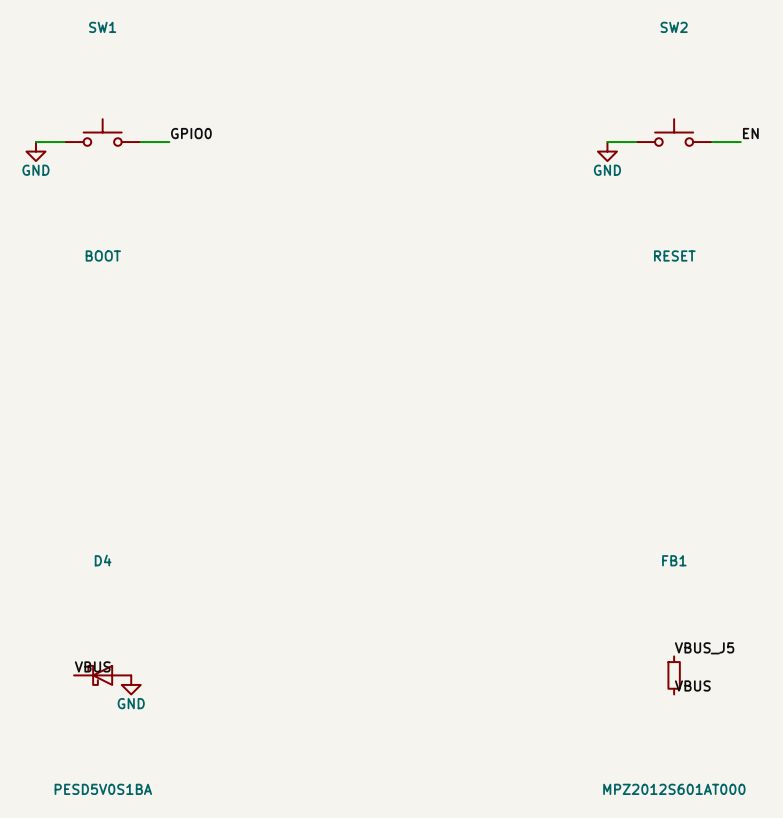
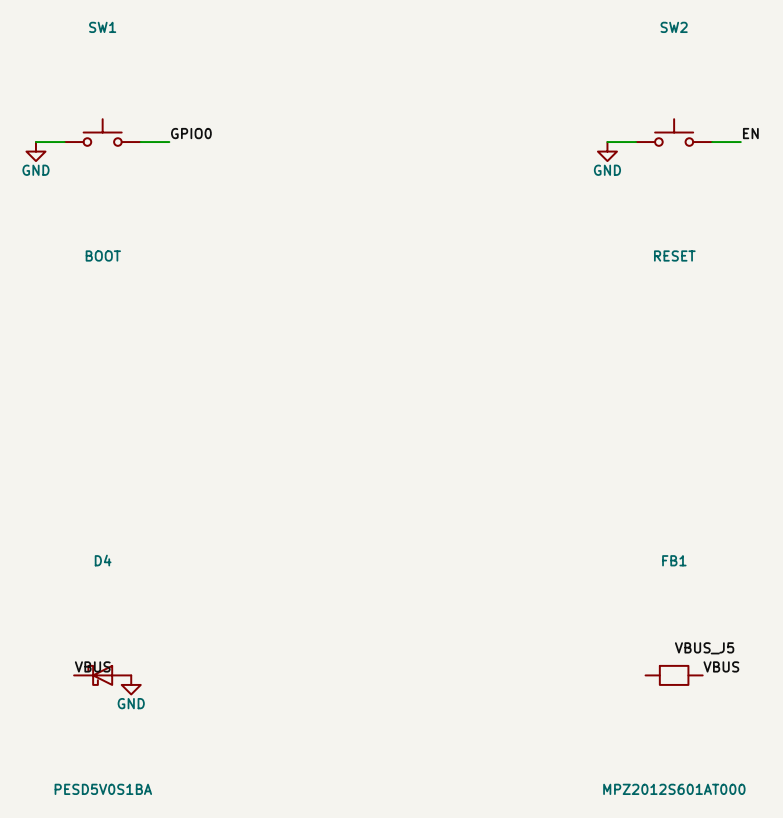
FB1 symbol: [667, 656, 681, 695] -> [645, 665, 703, 686]
label position: VBUS (692, 685) -> VBUS (721, 666)

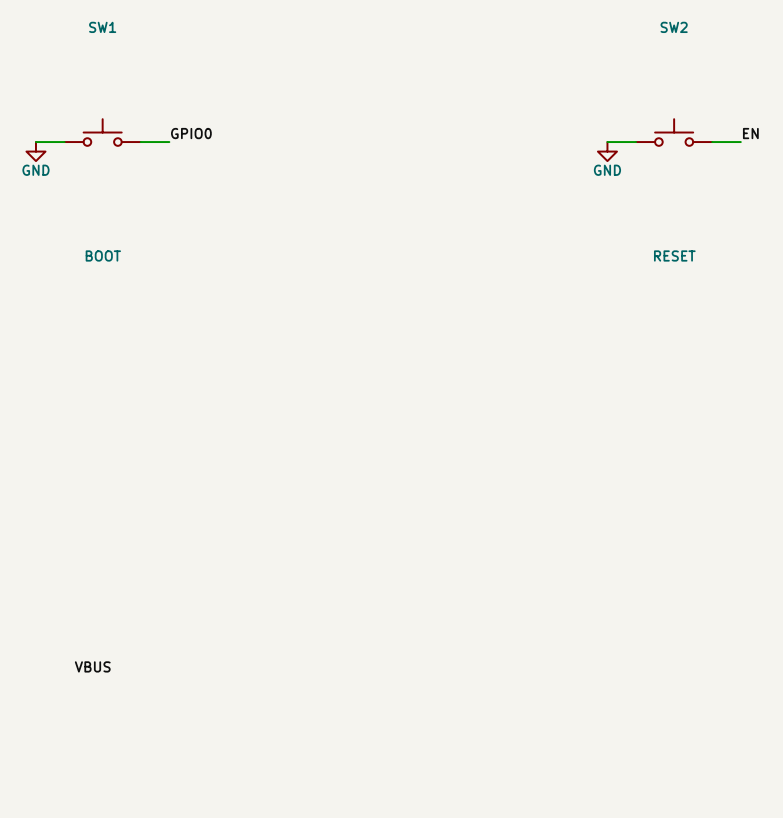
label: VBUS_J5 (704, 648) -> none
label: VBUS (721, 666) -> none
D4: PESD5V0S1BA (102, 675) -> none
FB1: MPZ2012S601AT000 (674, 675) -> none
power symbol: GND (131, 684) -> none

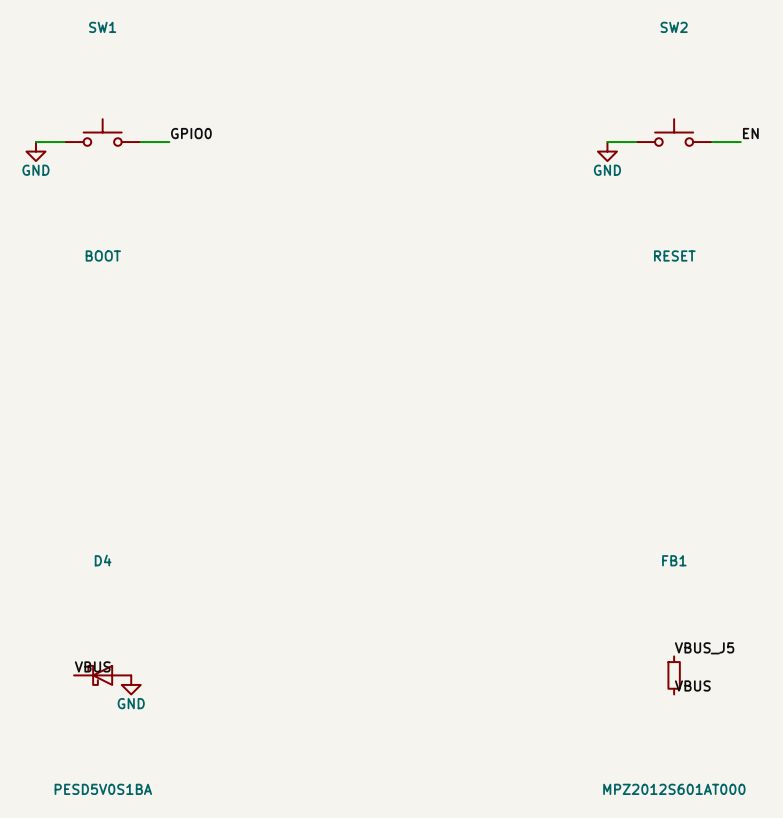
label: none -> VBUS_J5 (704, 648)
D4: none -> PESD5V0S1BA (102, 675)
FB1: none -> MPZ2012S601AT000 (674, 675)
power symbol: none -> GND (131, 684)
label: none -> VBUS (692, 685)

